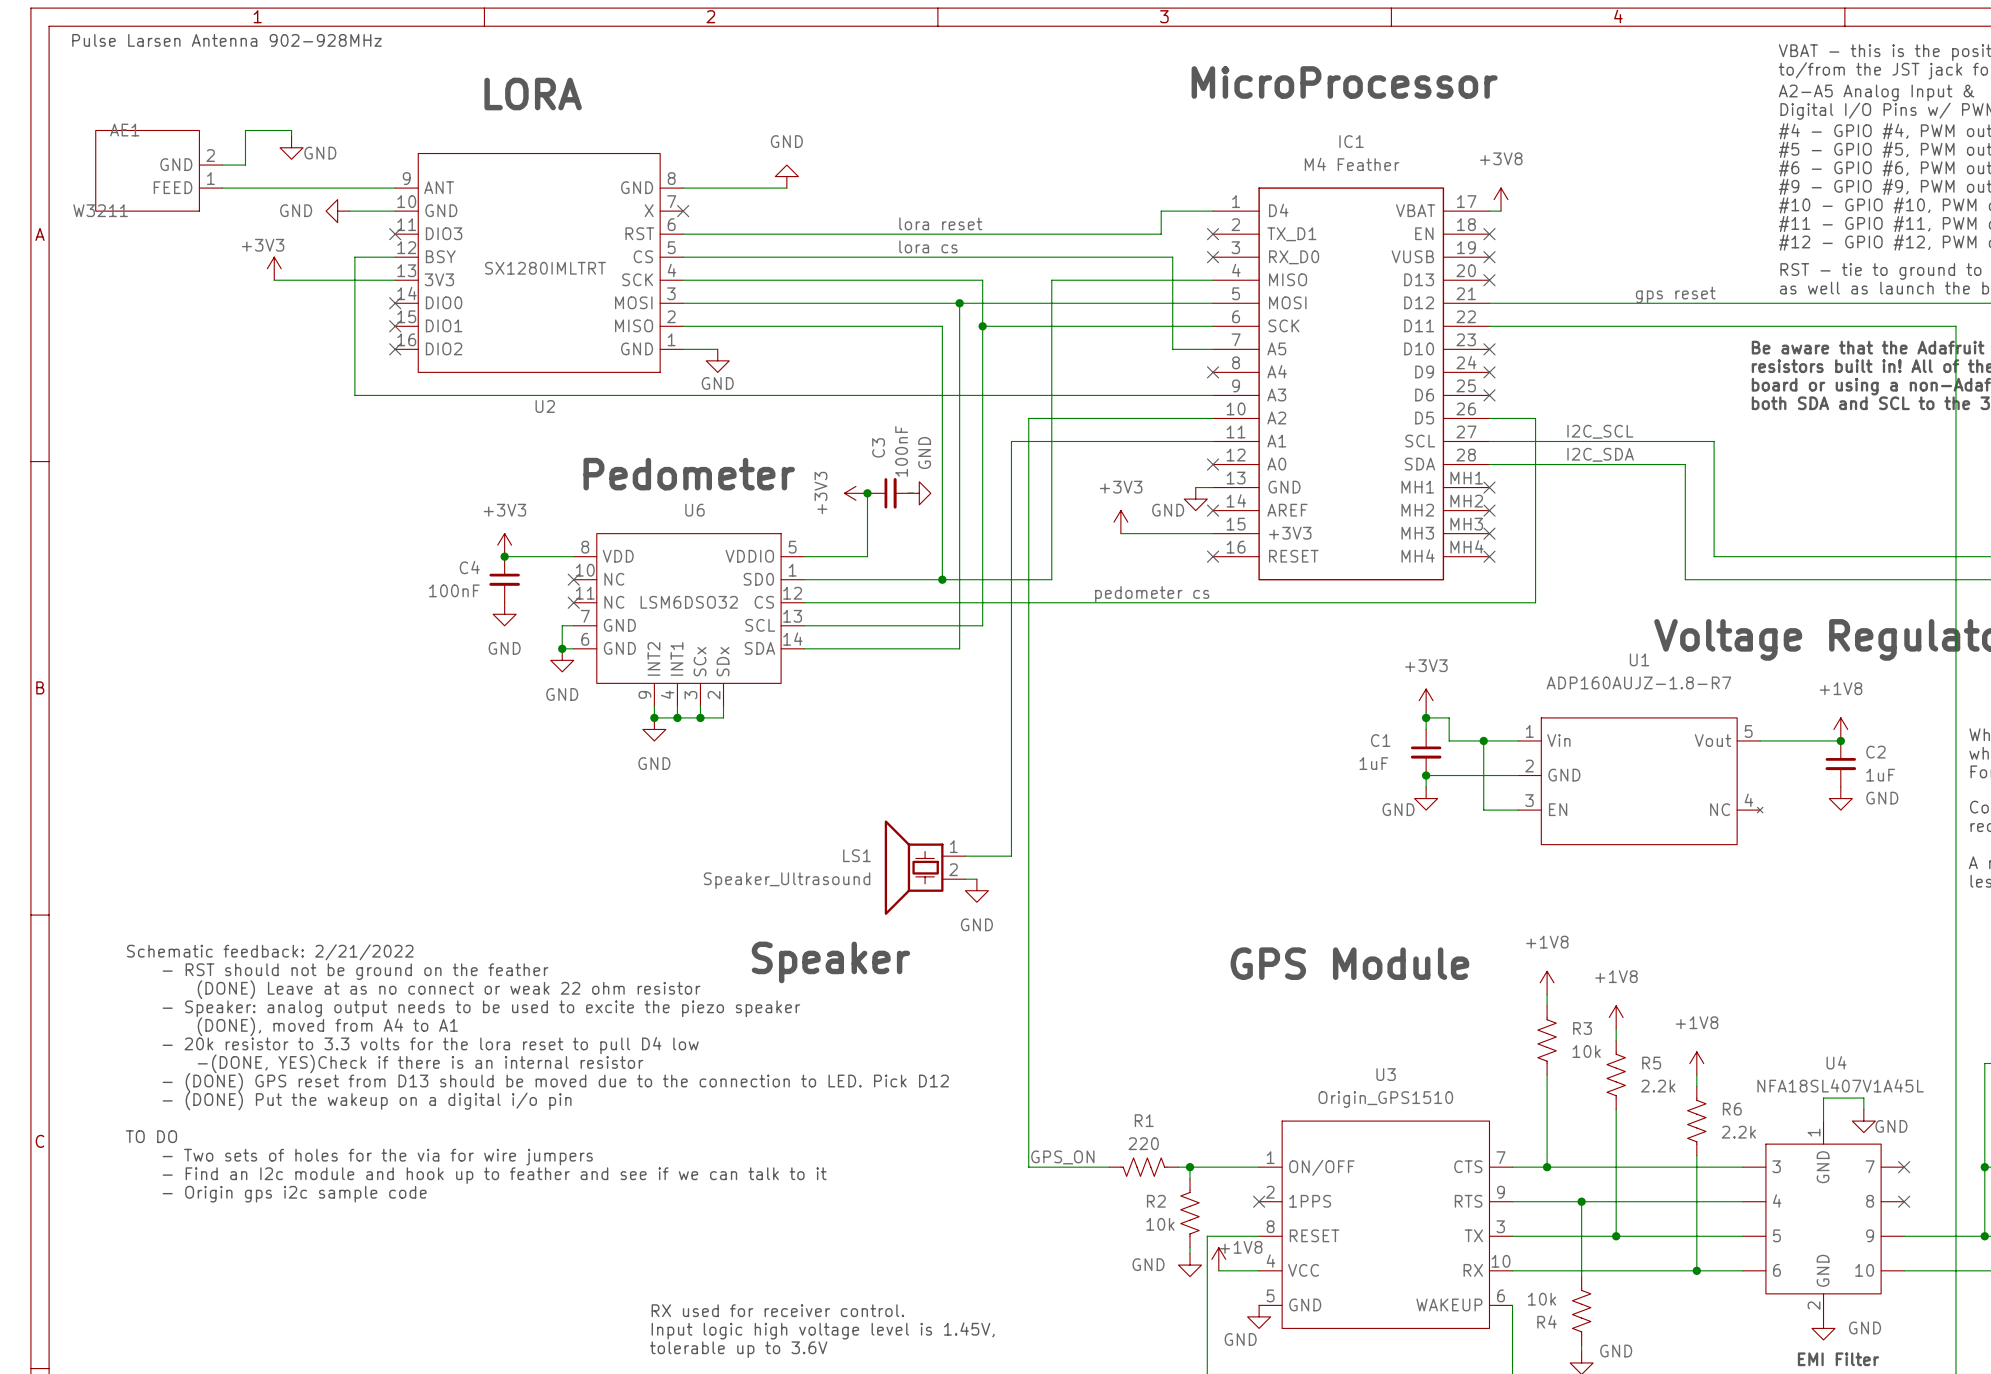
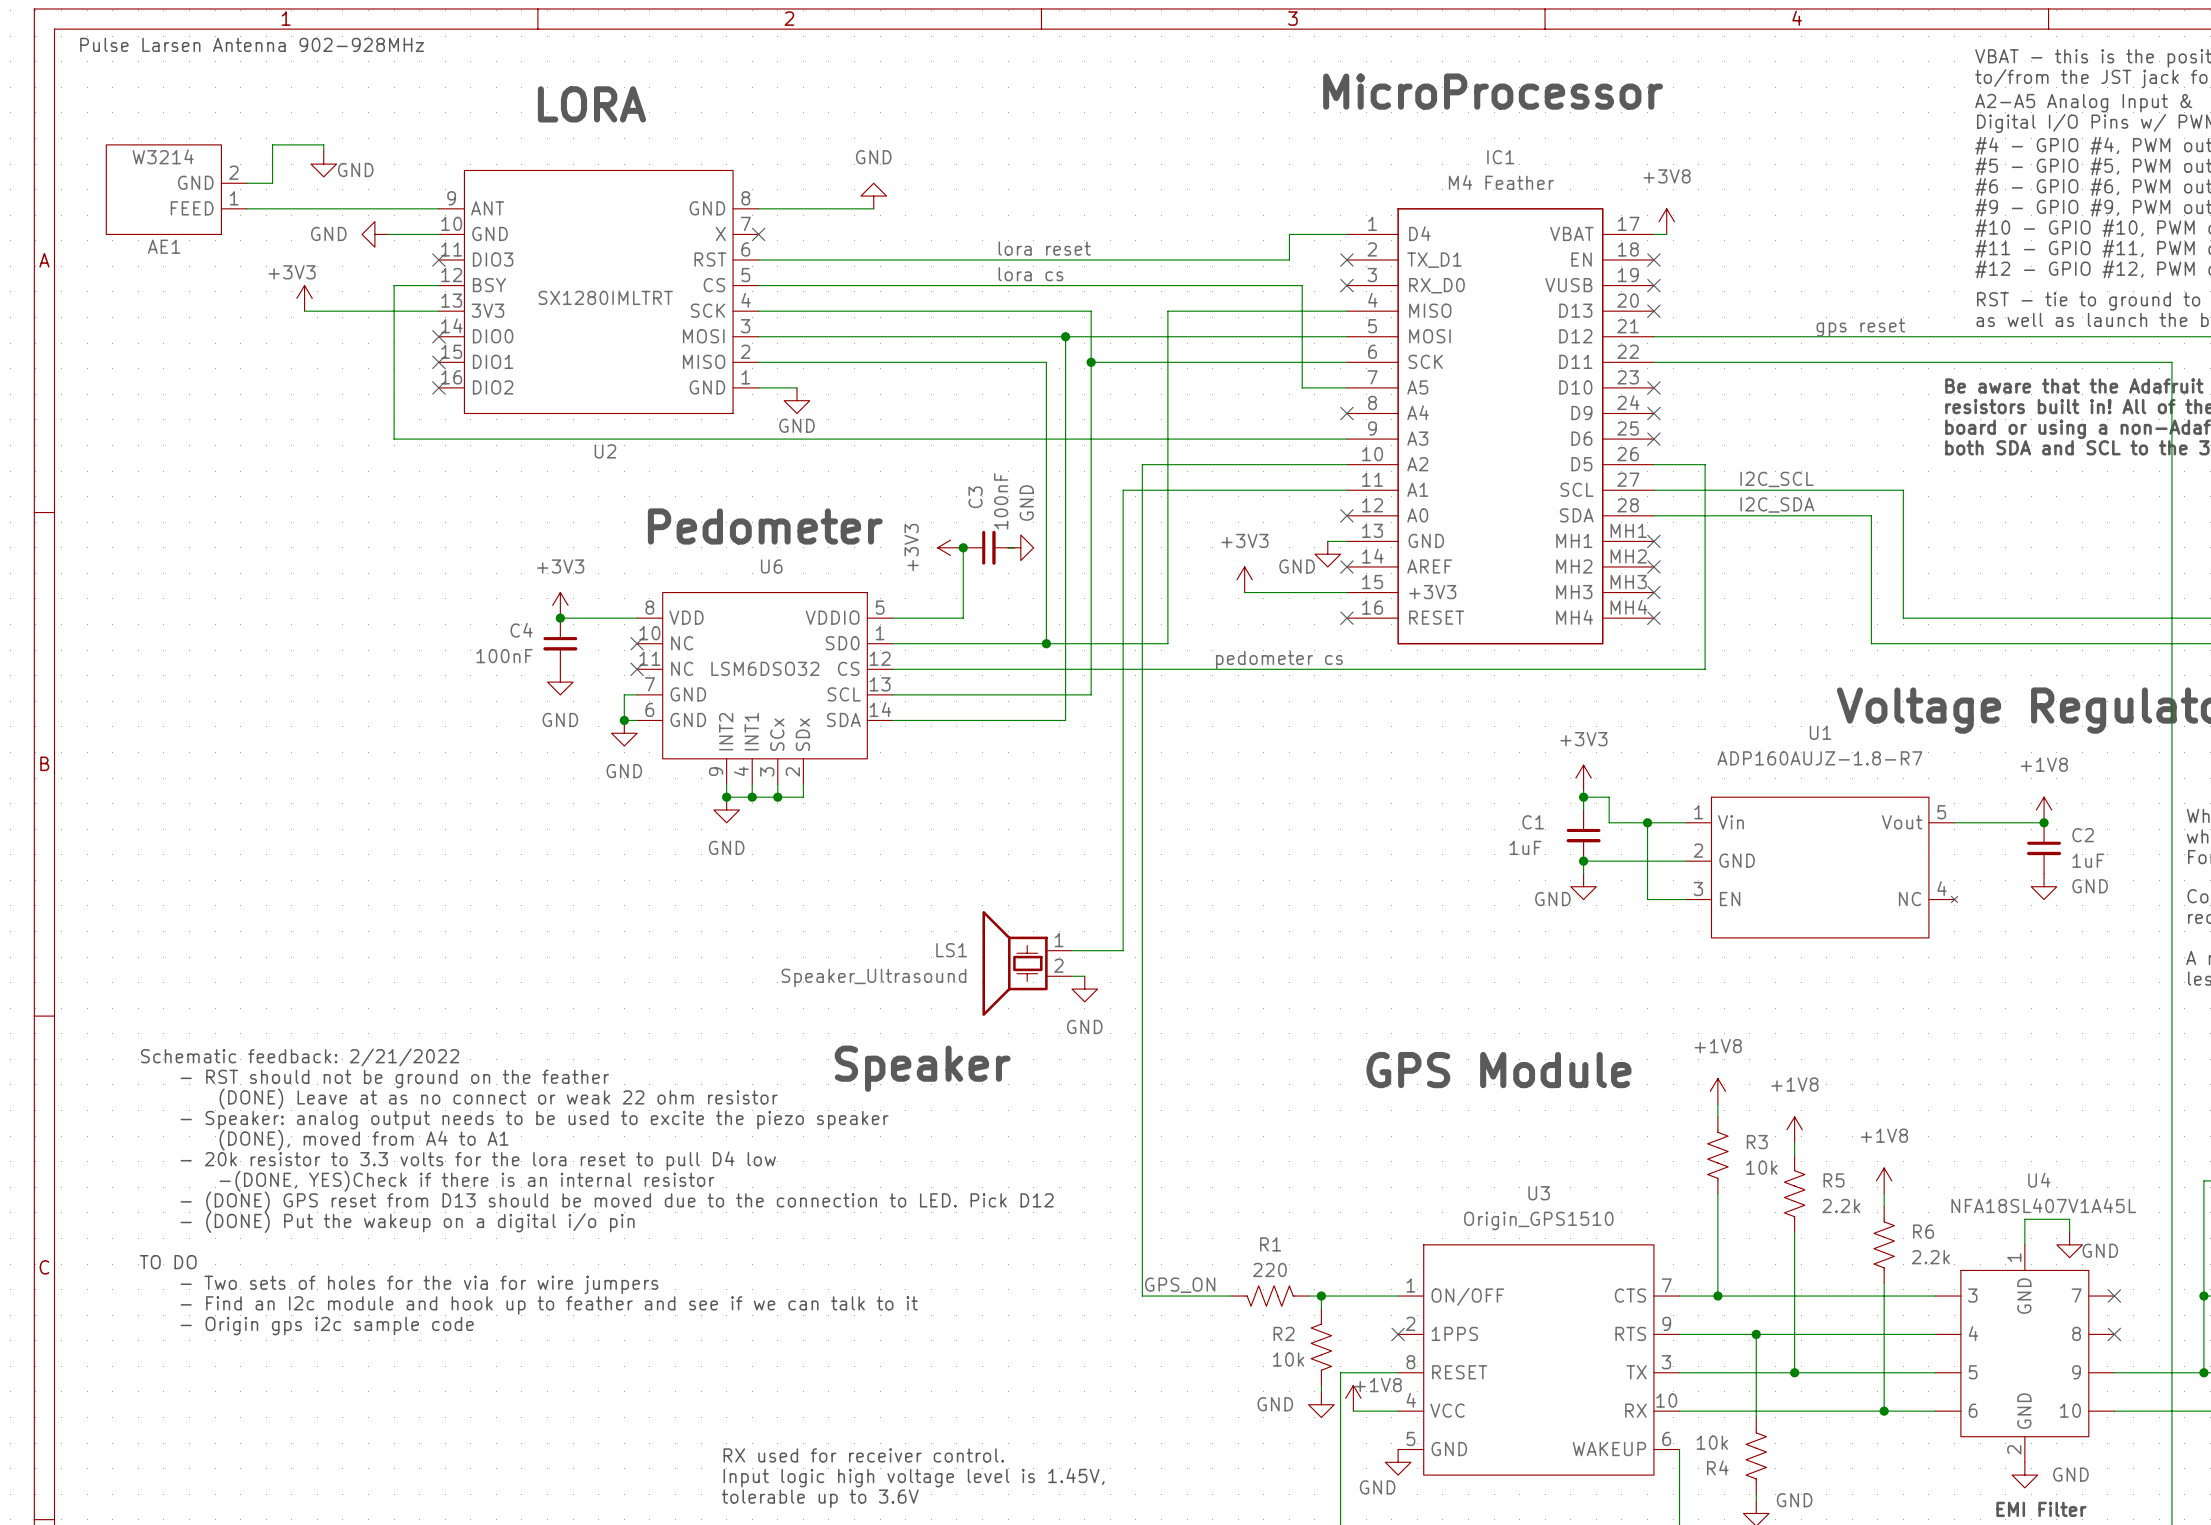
AE1 name position: AE1 (124, 130) -> AE1 (164, 246)
AE1 value: W3211 (100, 210) -> W3214 (163, 156)

